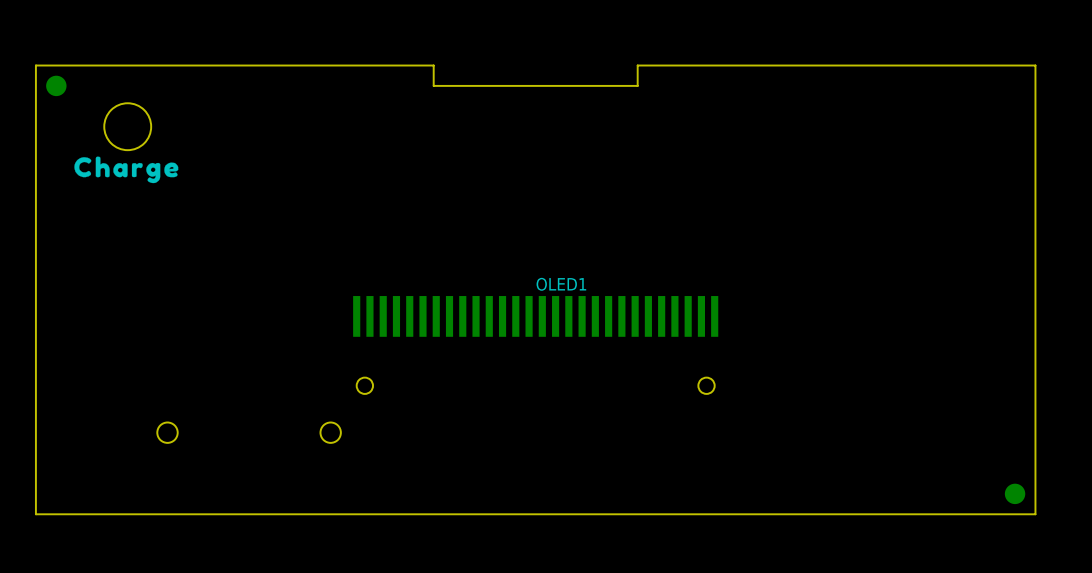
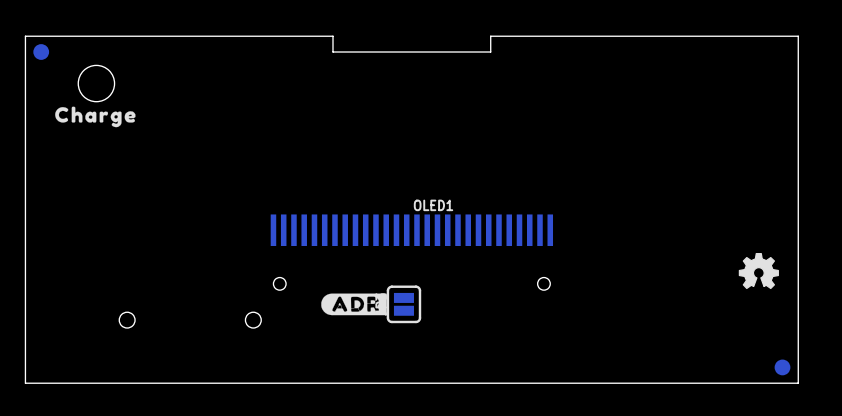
drawing: none -> [738, 253, 779, 290]
drawing: none -> [321, 293, 387, 316]
part: none -> (403, 304)

